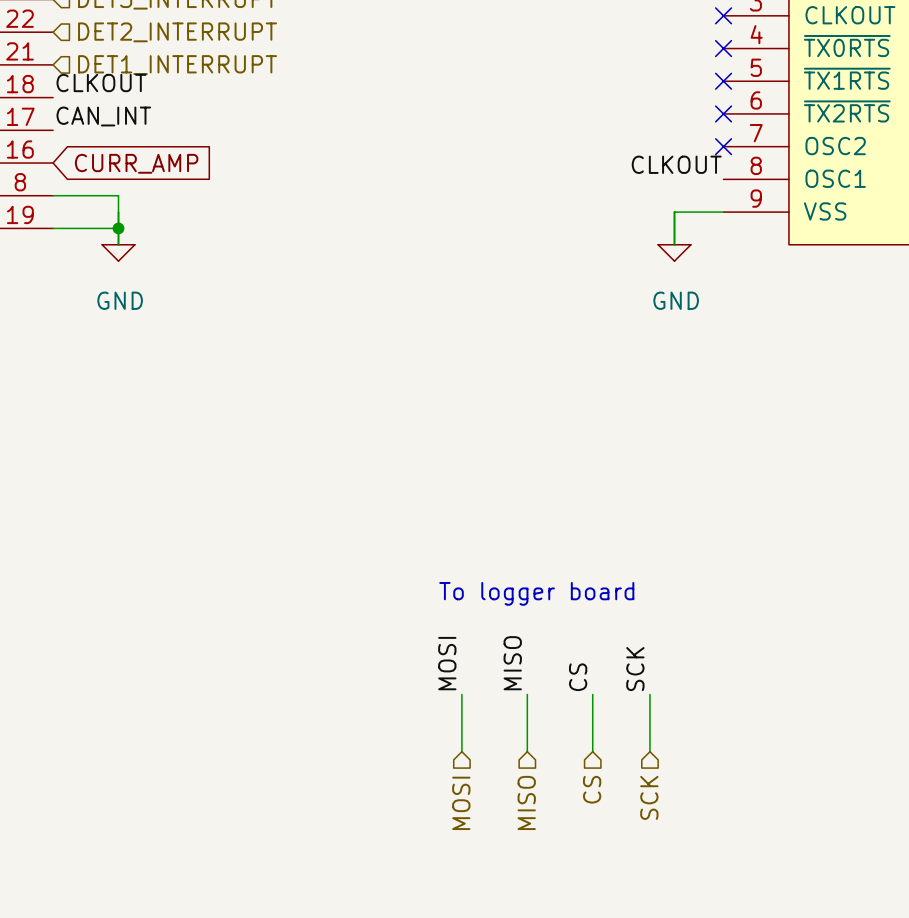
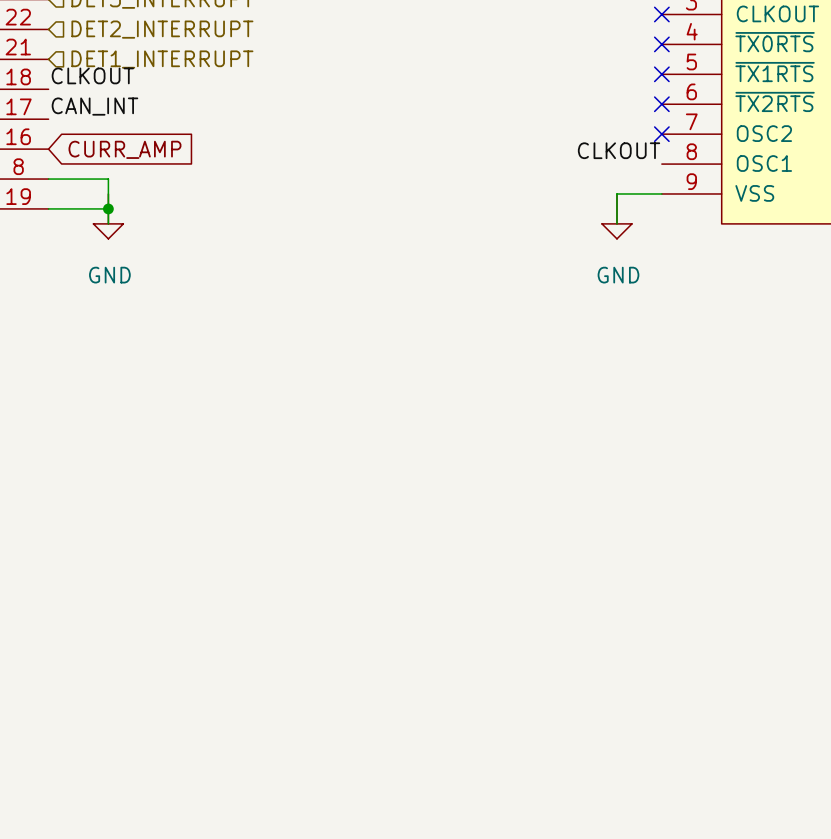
text: To logger board (536, 593) -> none
label: MOSI (447, 663) -> none
label: MISO (512, 663) -> none
label: SCK (635, 669) -> none
label: CS (578, 677) -> none
wire: (461, 694) (461, 751) -> none
wire: (527, 694) (527, 751) -> none
wire: (592, 694) (592, 751) -> none
wire: (649, 694) (649, 751) -> none
hierarchical label: CS (592, 789) -> none
hierarchical label: SCK (649, 797) -> none
hierarchical label: MISO (526, 802) -> none
hierarchical label: MOSI (461, 803) -> none

